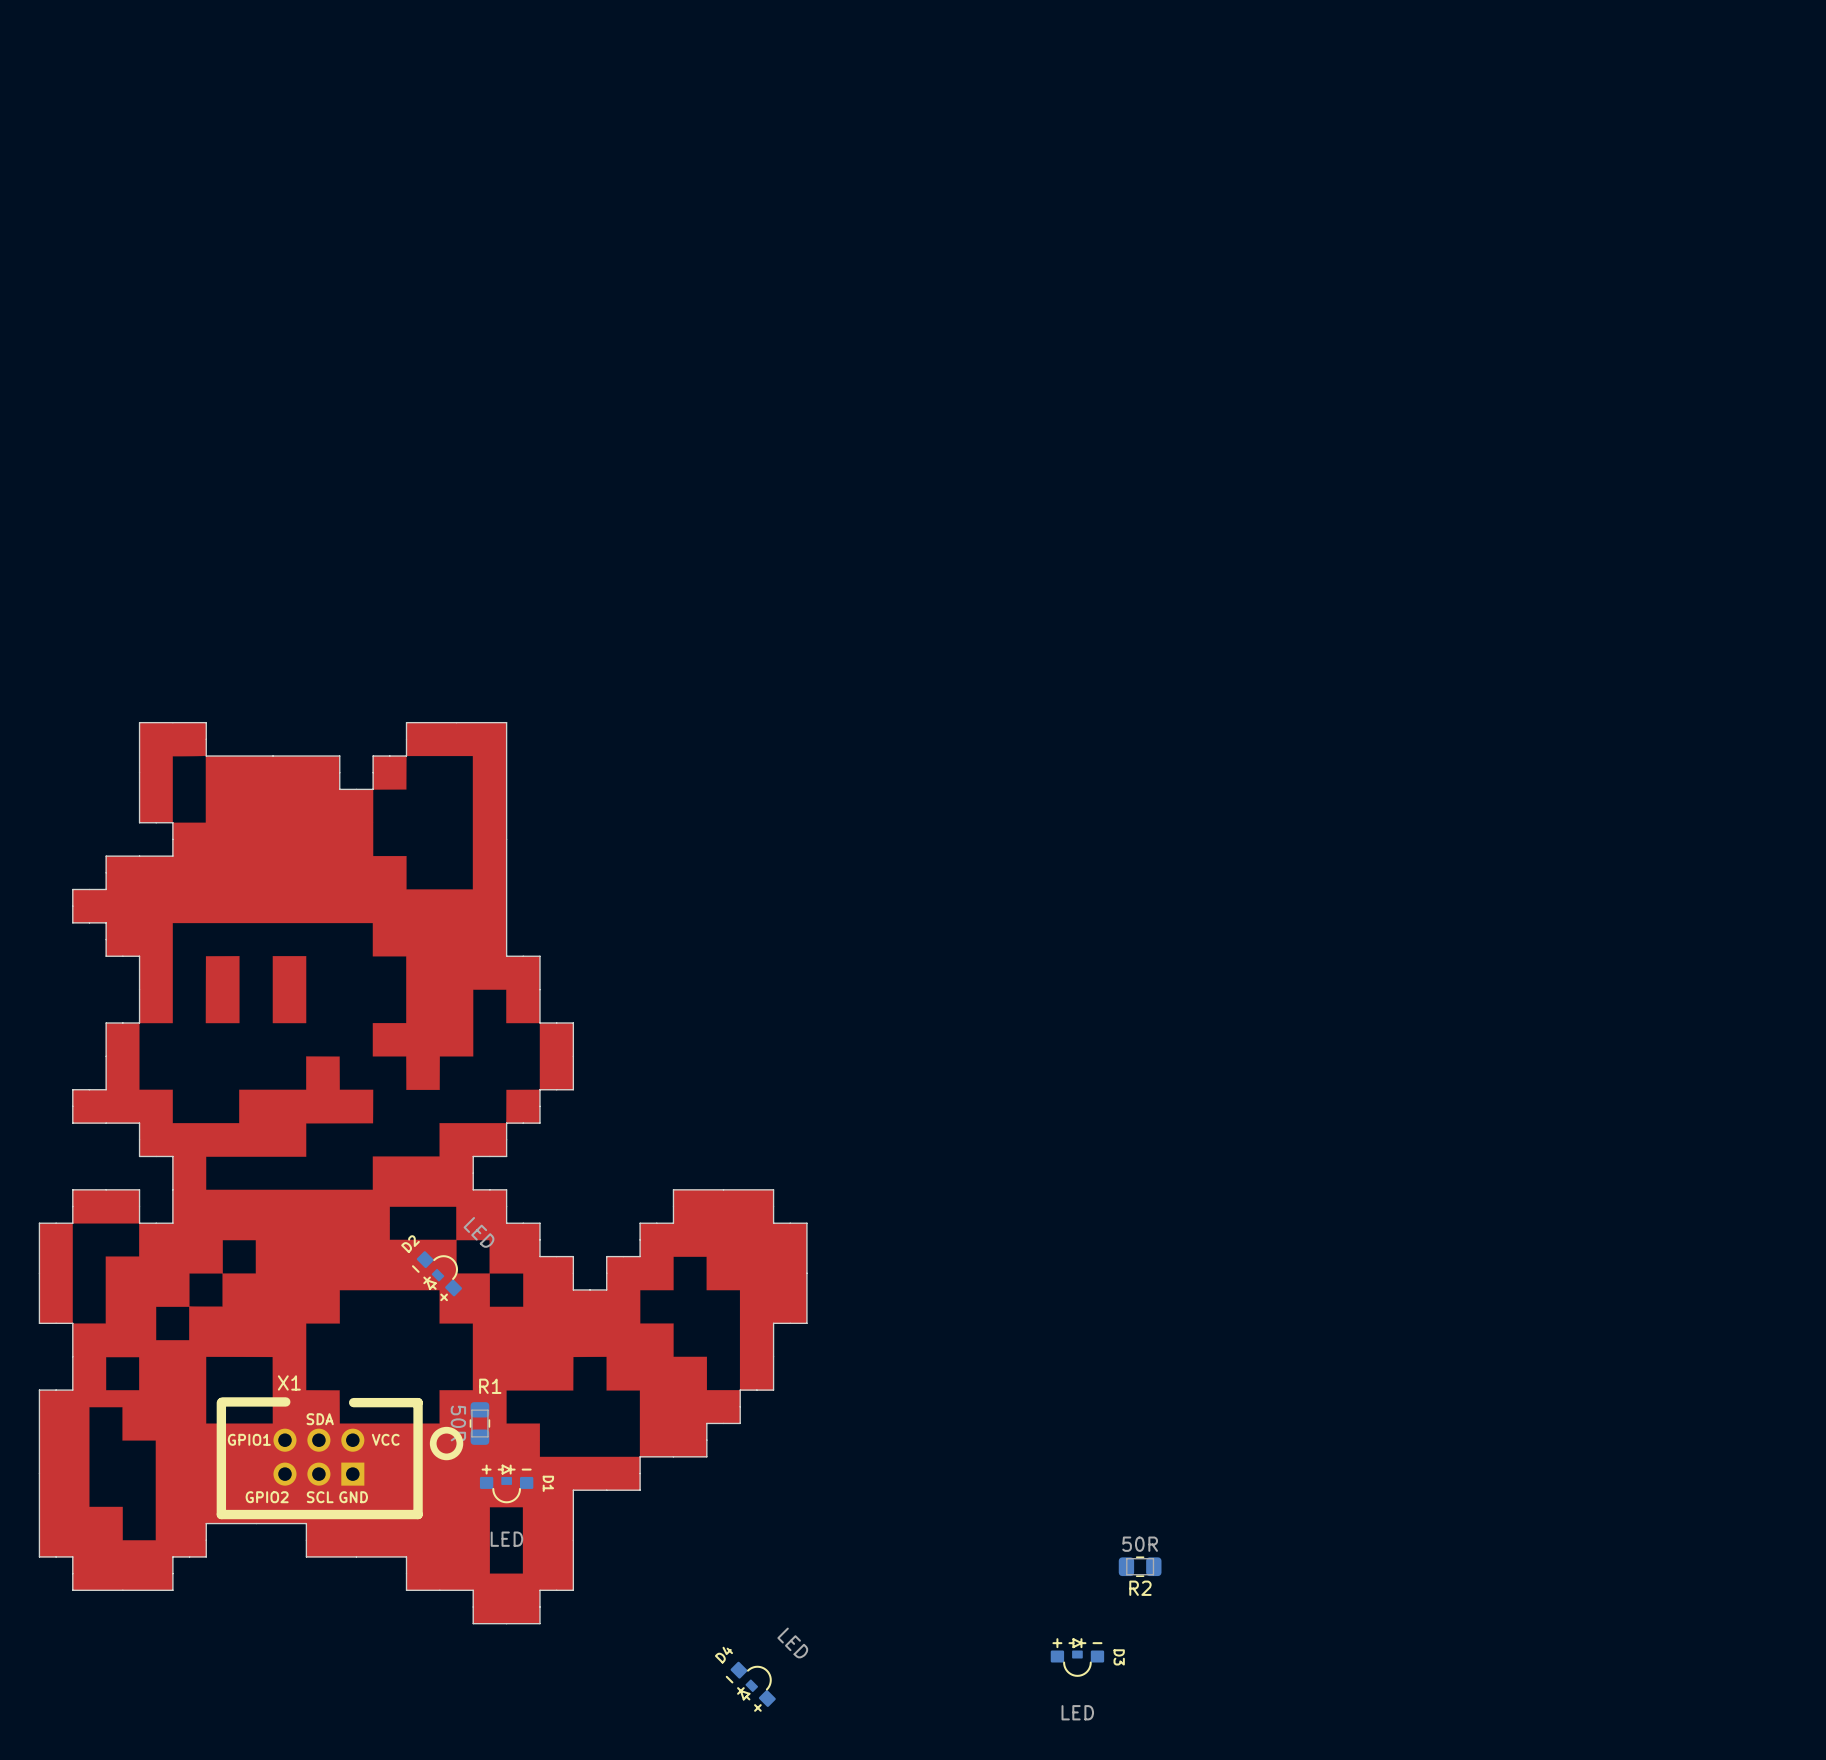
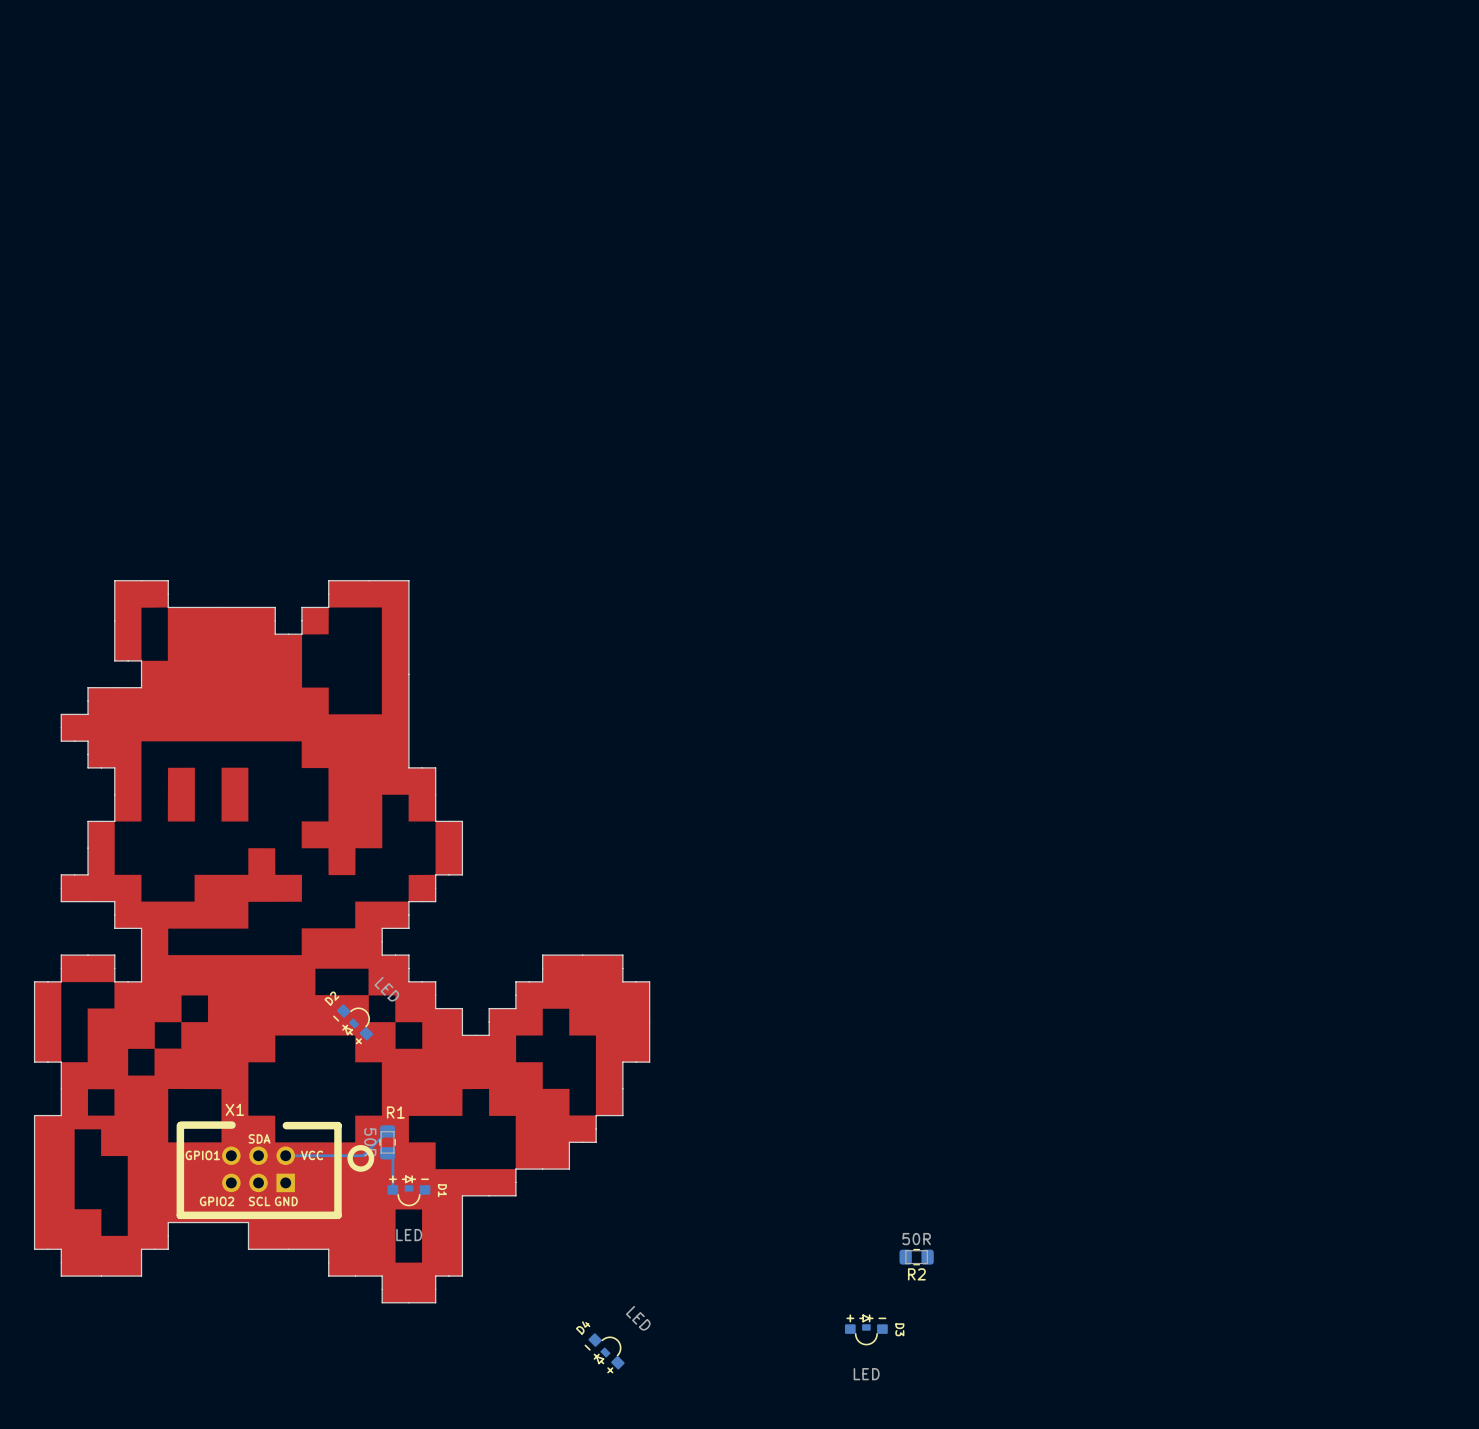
bottom track: none -> (387, 1131) (363, 1155) (285, 1155)
bottom track: none -> (387, 1153) (392, 1158) (392, 1189)

